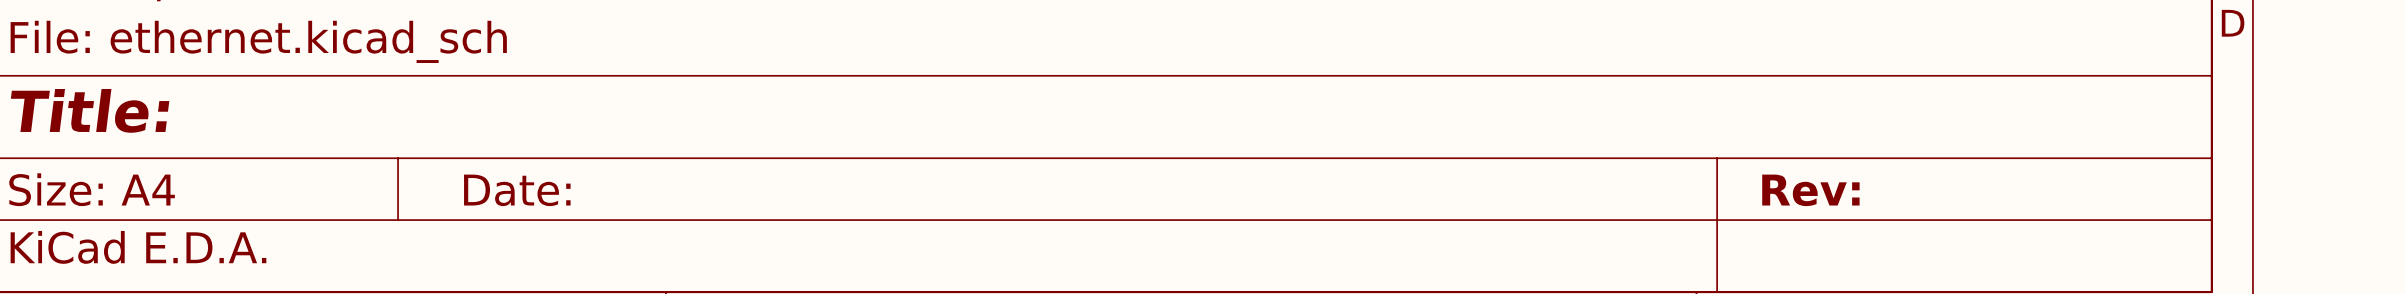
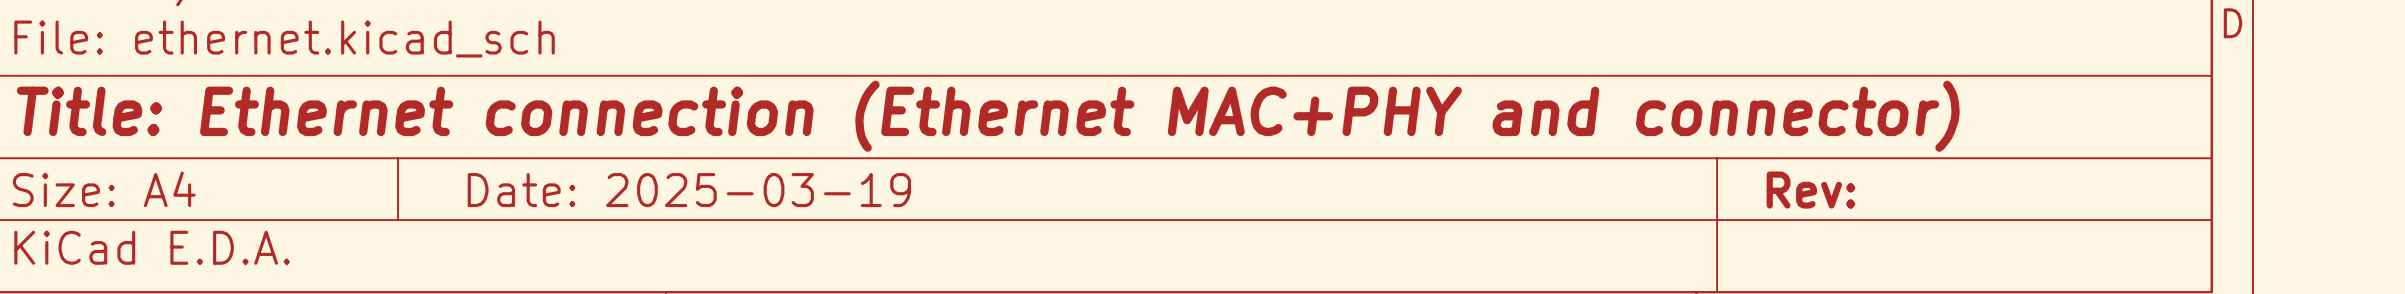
title block: Title: (90, 110) -> Title: Ethernet connection (Ethernet MAC+PHY and connector) (988, 116)
title block: Date: (517, 190) -> Date: 2025-03-19 (689, 190)

